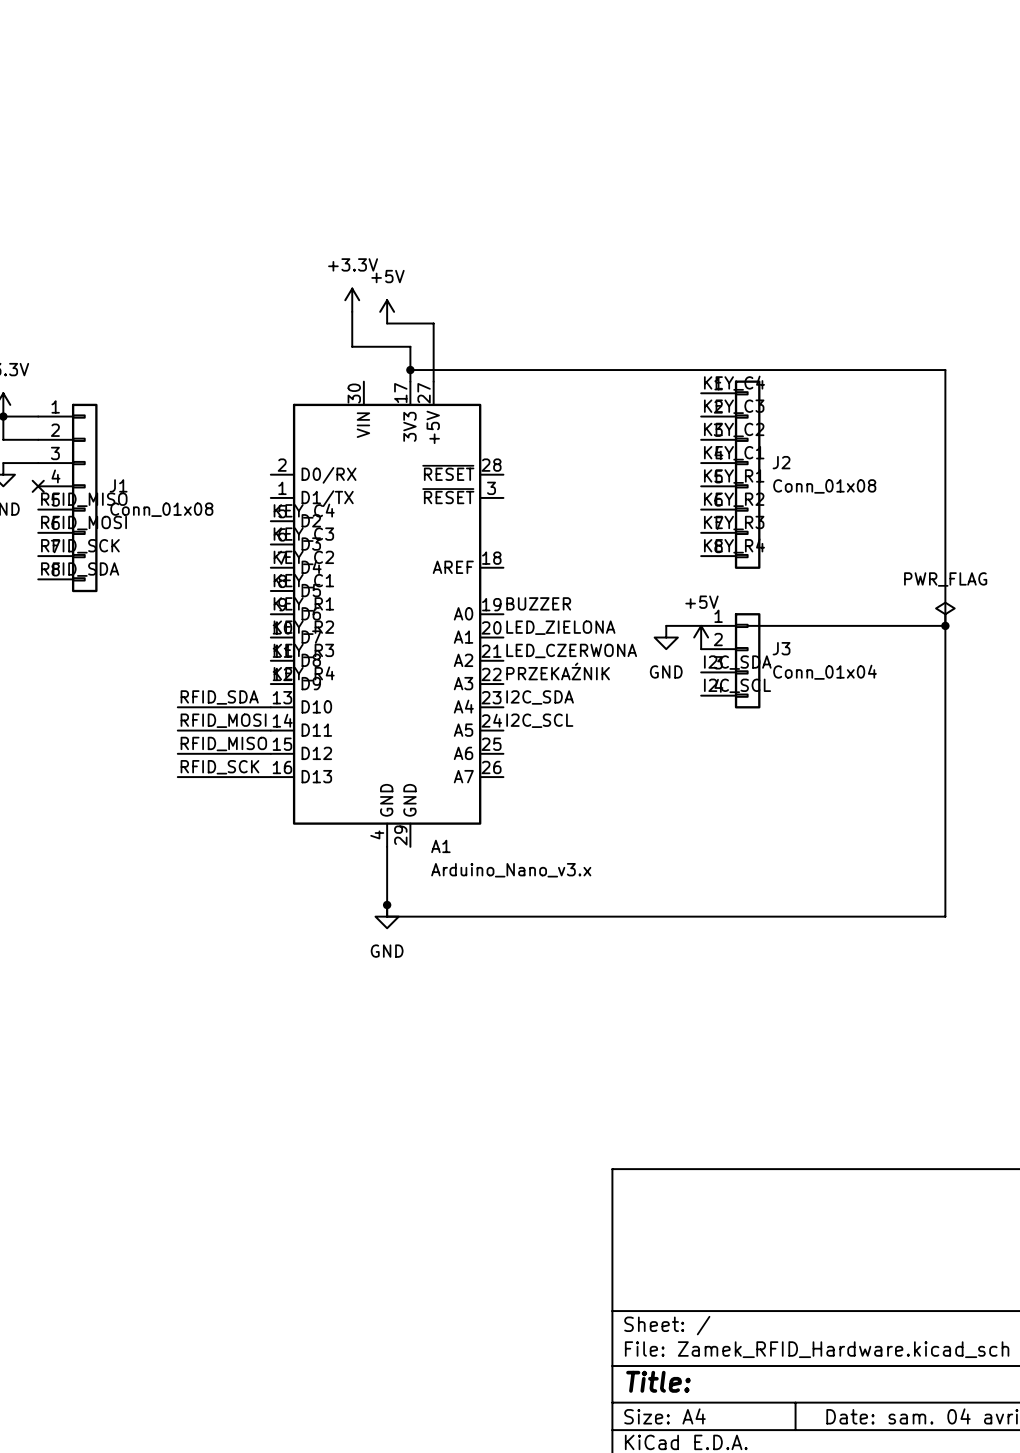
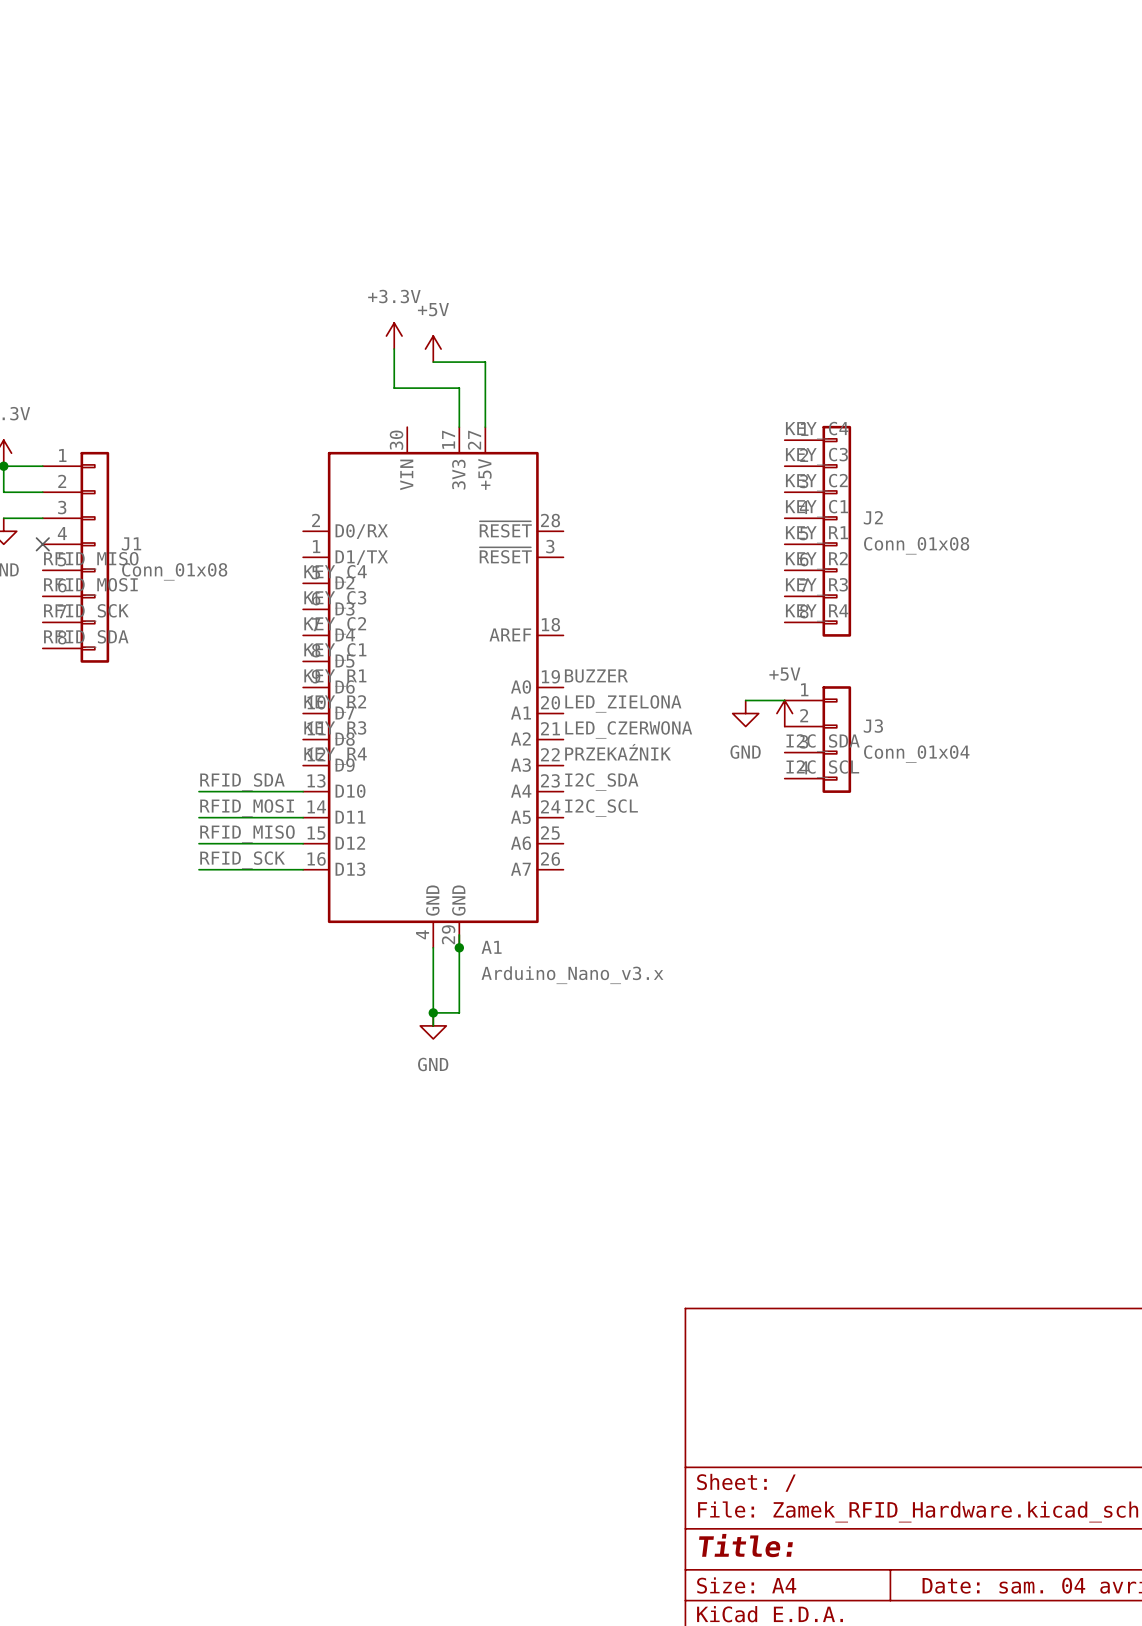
wire: (410, 370) (945, 370) (945, 916) (387, 916) -> none
junction: (410, 370) -> none
power symbol: PWR_FLAG (945, 614) -> none
wire: (747, 625) (945, 625) -> none
junction: (945, 625) -> none
wire: none -> (459, 934) (459, 1012) (433, 1012)
junction: none -> (459, 947)

